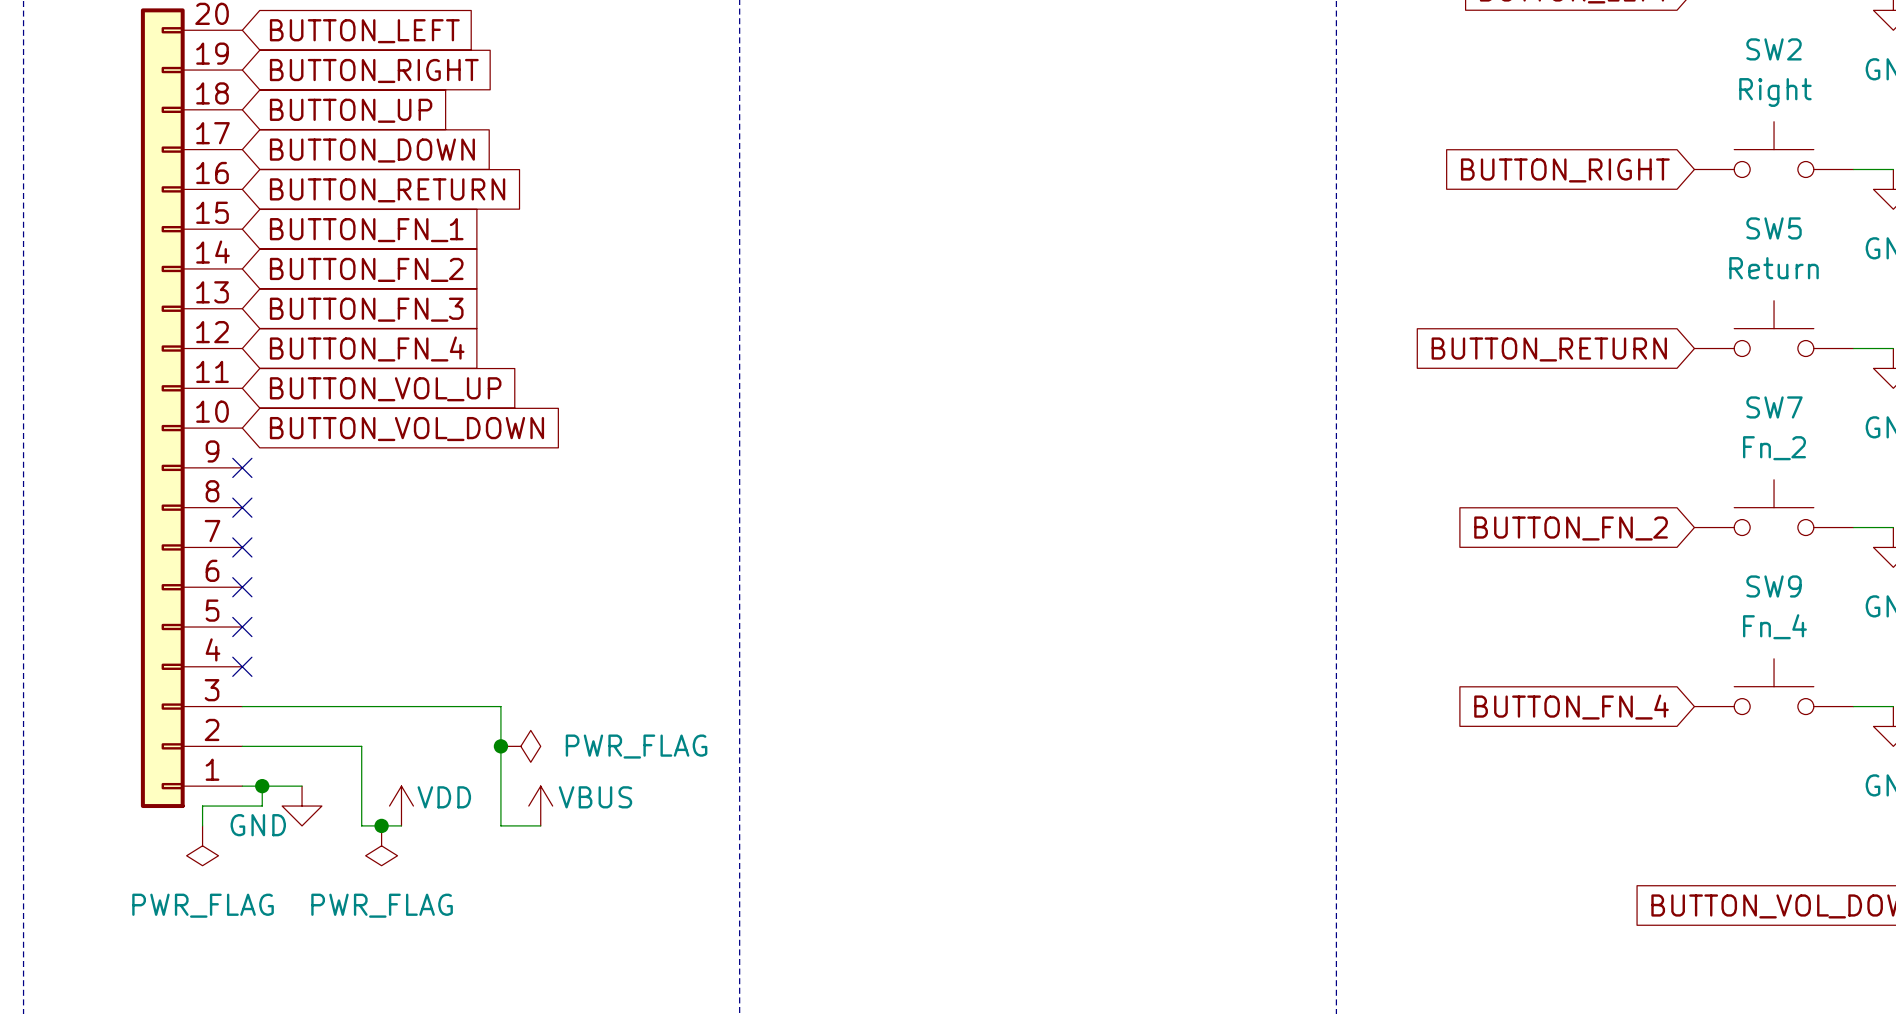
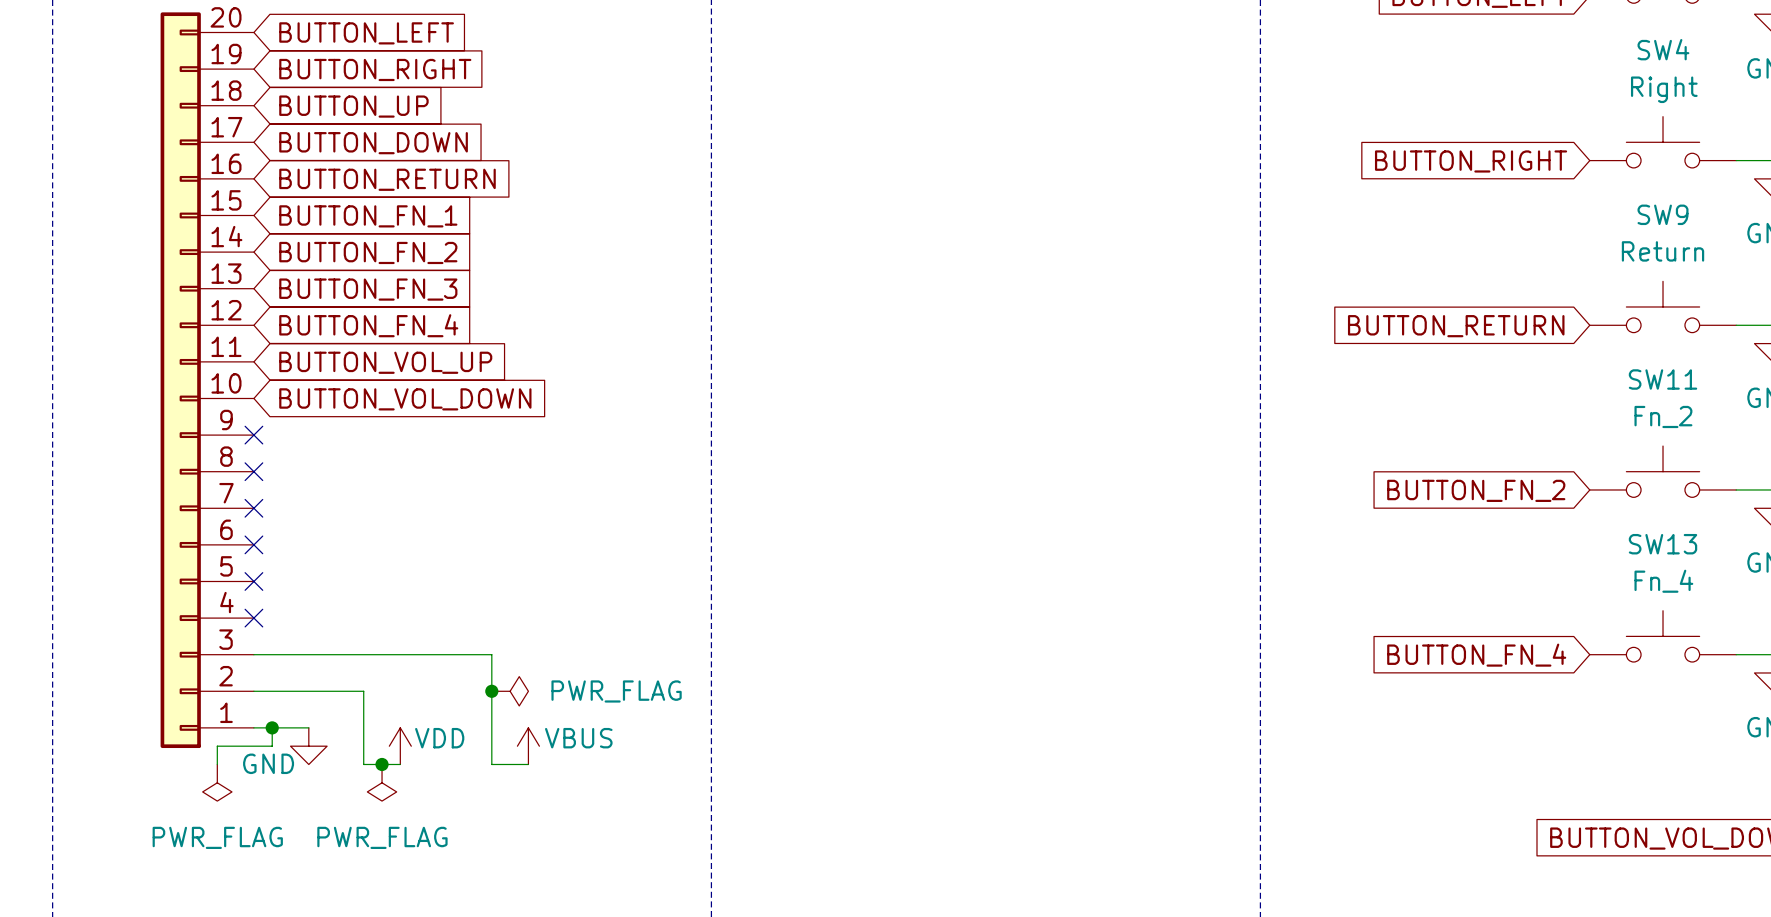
SW2 name: SW2 (1774, 49) -> SW4 (1663, 49)
SW5 name: SW5 (1774, 228) -> SW9 (1663, 214)
SW7 name: SW7 (1774, 407) -> SW11 (1663, 379)
SW9 name: SW9 (1774, 586) -> SW13 (1663, 544)

